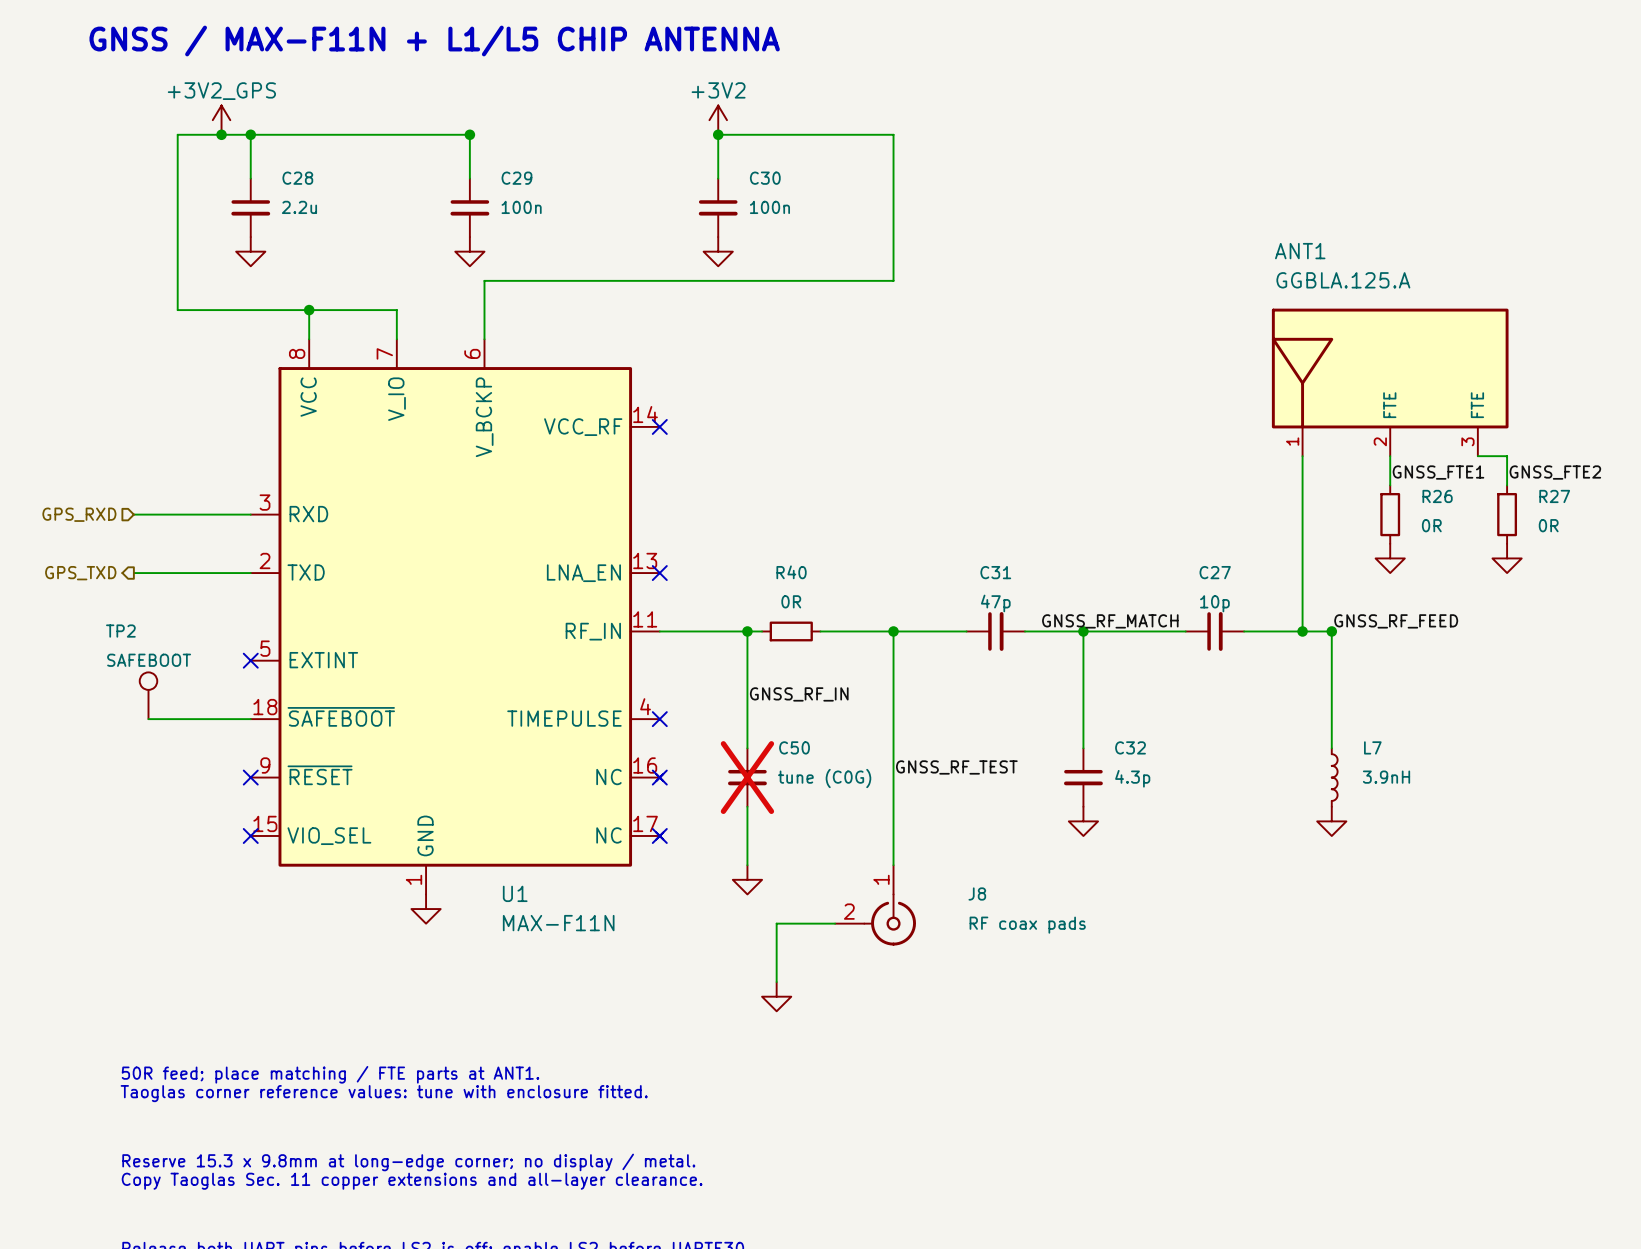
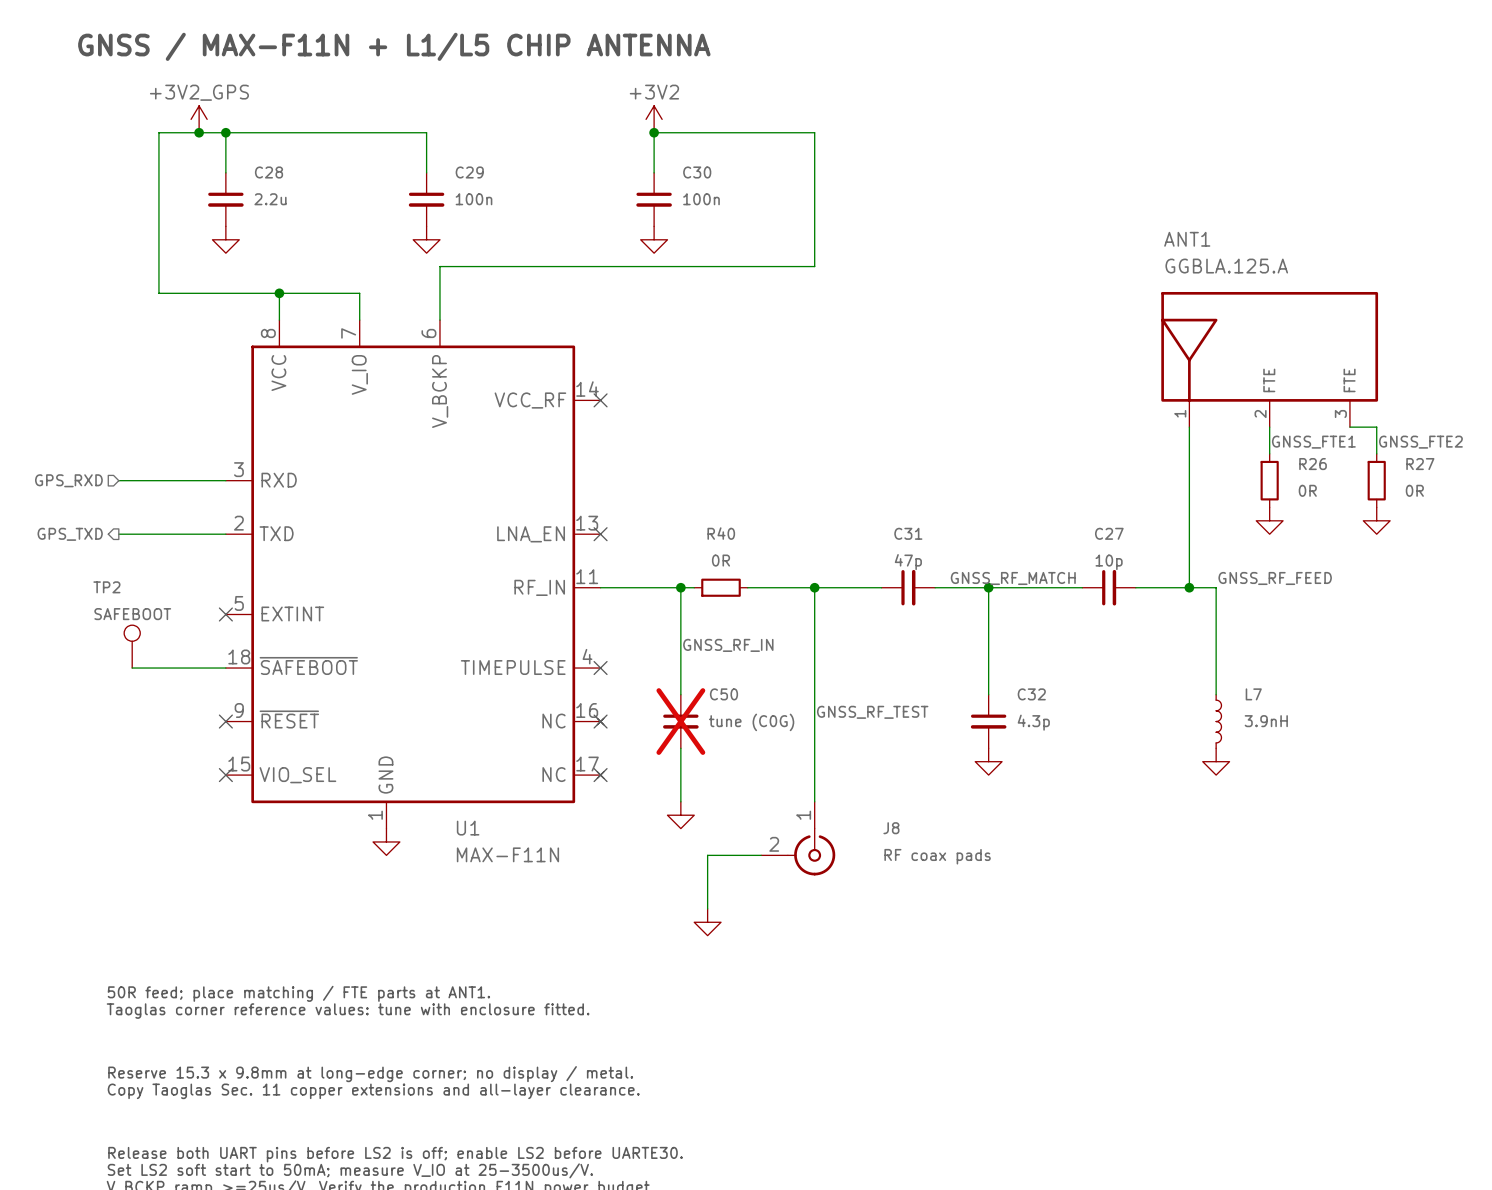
junction: (469, 134) -> none
junction: (1331, 631) -> none

